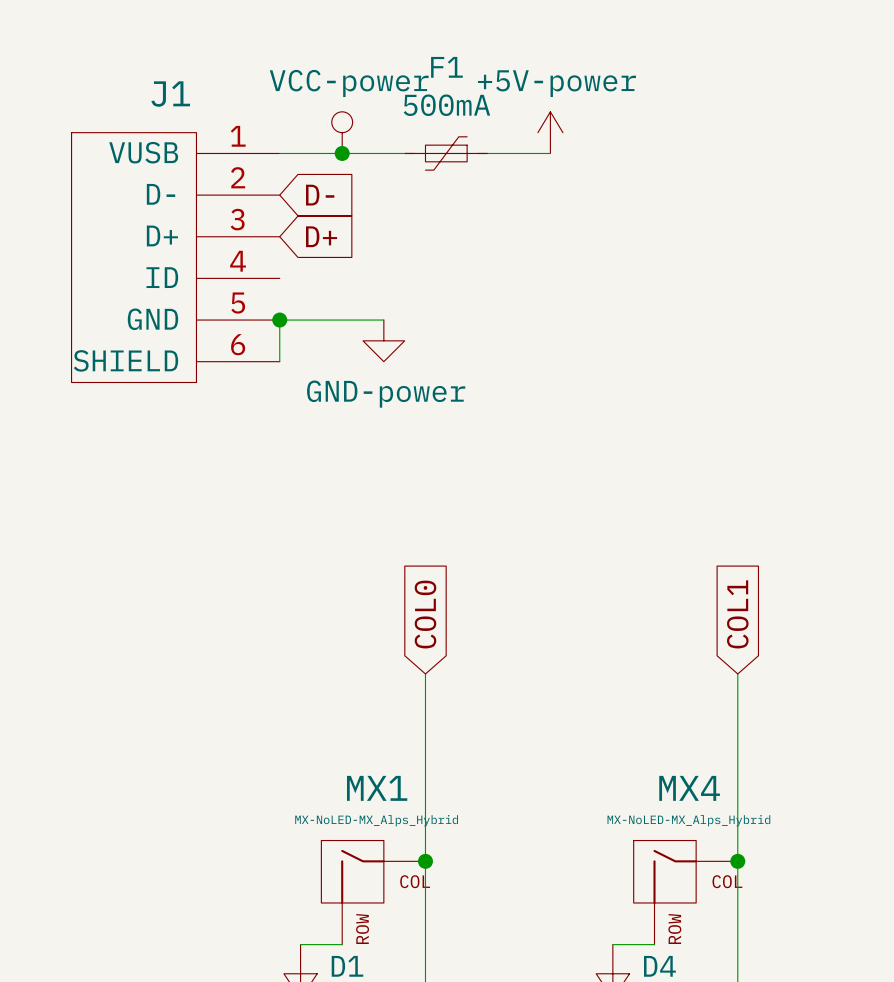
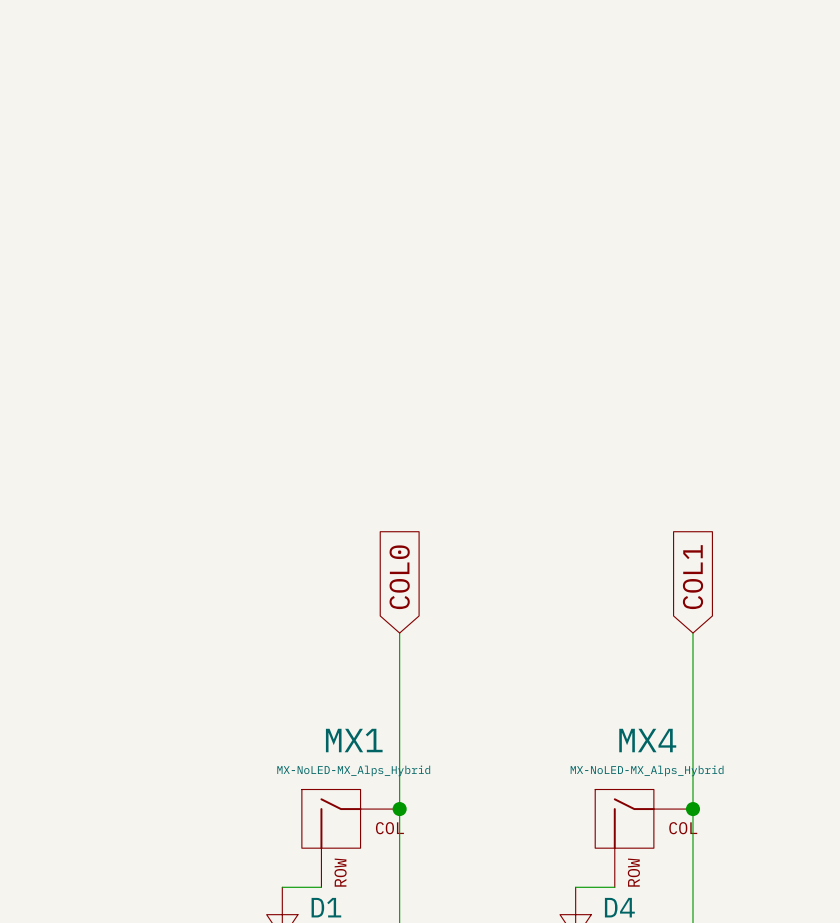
power symbol: VCC-power (342, 132) -> none
power symbol: +5V-power (550, 132) -> none
wire: (279, 153) (404, 153) -> none
junction: (342, 153) -> none
F1: 500mA (446, 153) -> none
wire: (487, 153) (550, 153) -> none
global label: D- (320, 195) -> none
global label: D+ (321, 236) -> none
J1: (175, 257) -> none
junction: (279, 320) -> none
wire: (383, 320) (279, 320) (279, 361) -> none
power symbol: GND-power (383, 340) -> none

